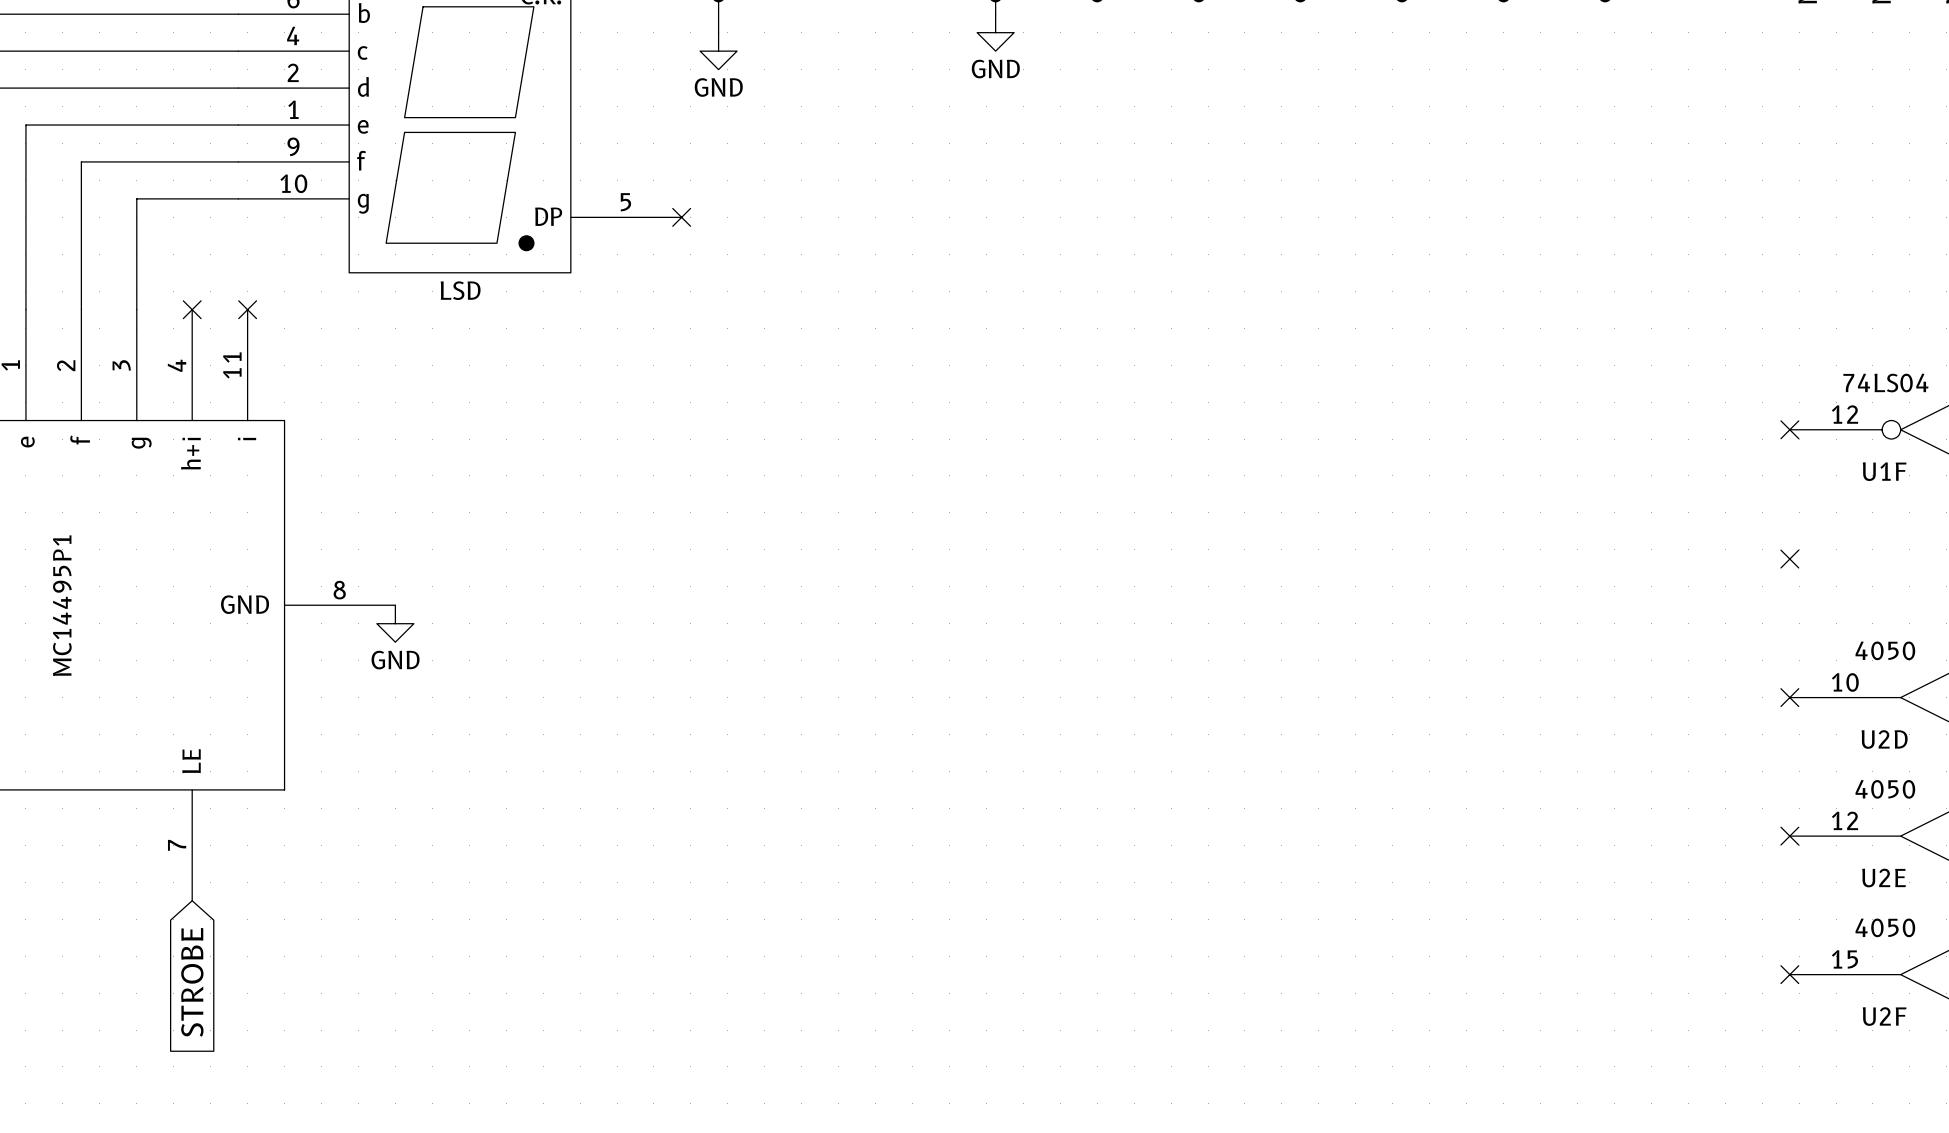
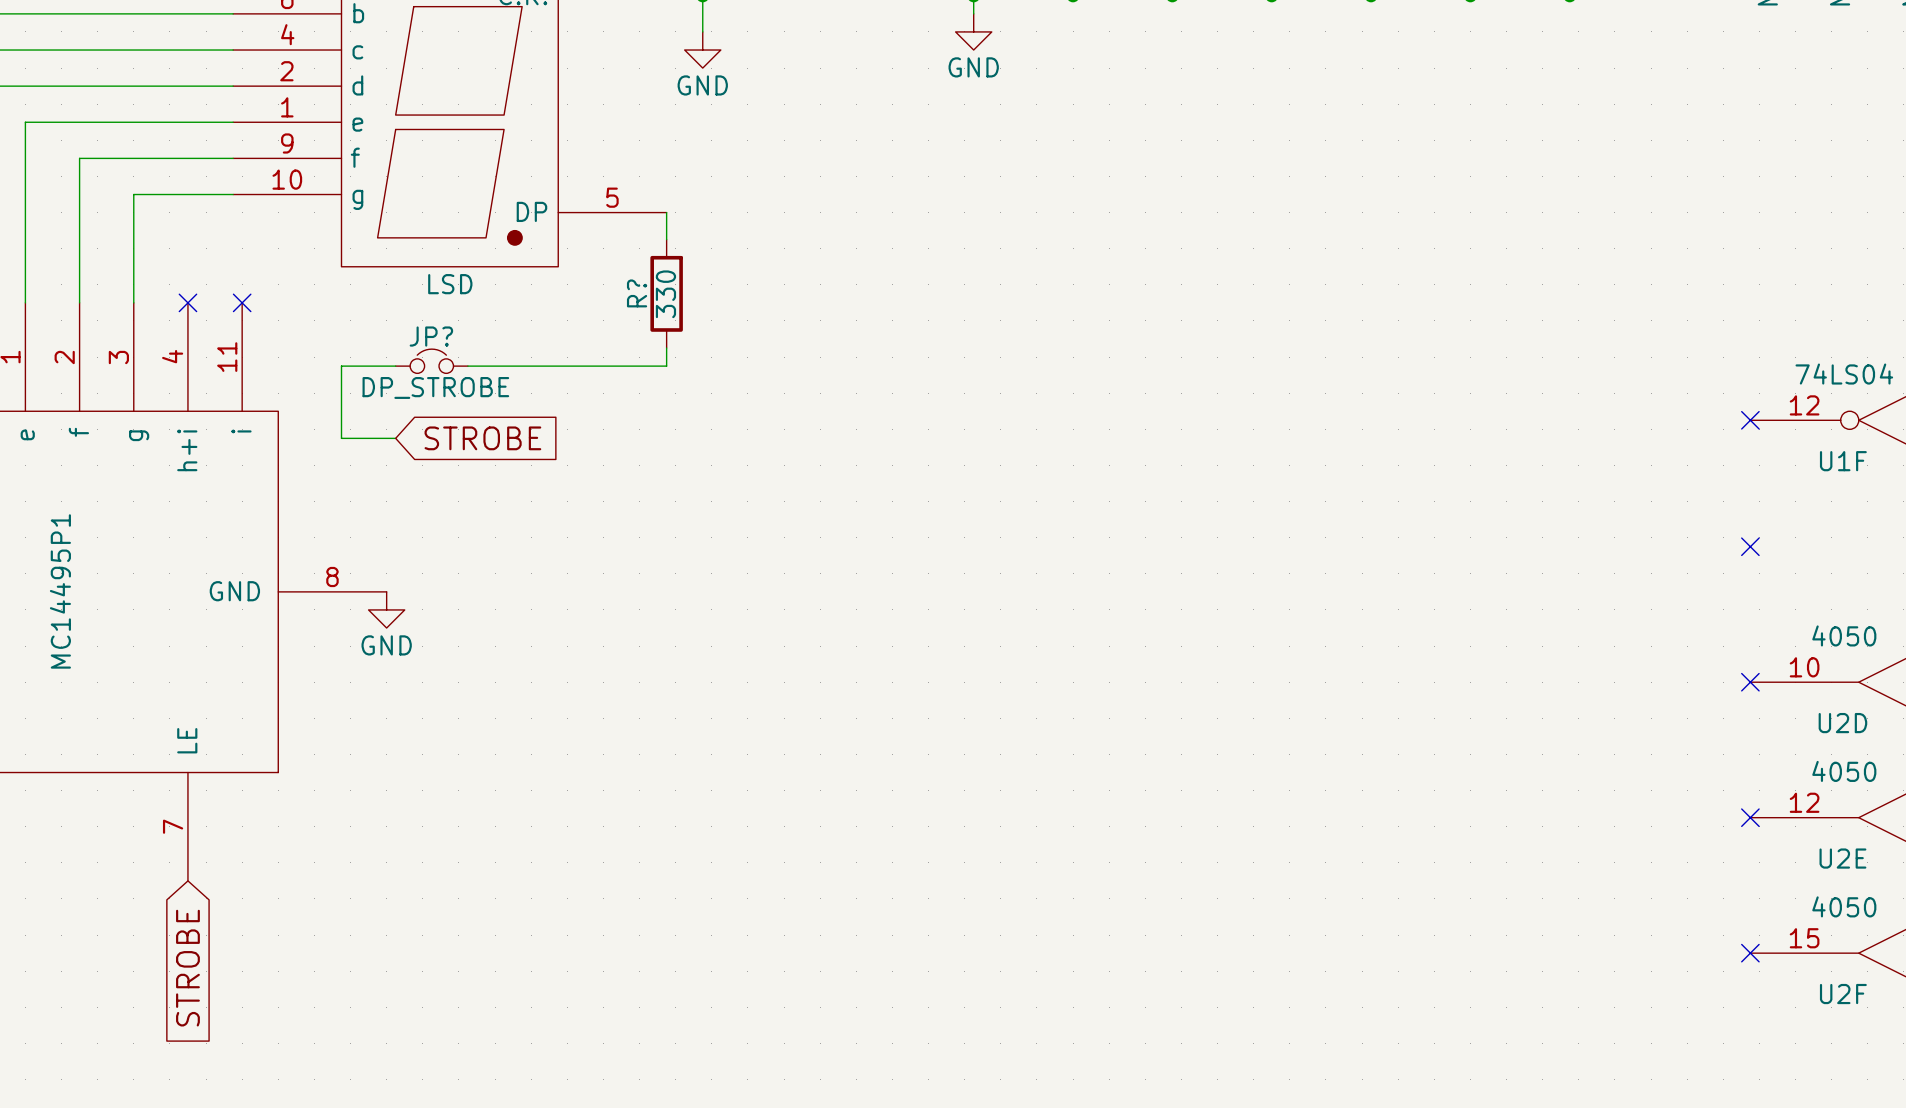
wire: none -> (666, 212) (666, 239)
no-connect mark: (681, 217) -> none
R?: none -> 330 (666, 293)
wire: none -> (666, 348) (666, 366) (467, 366)
JP?: none -> DP_STROBE (431, 361)
wire: none -> (395, 366) (341, 366) (341, 438) (395, 438)
global label: none -> STROBE (482, 438)

